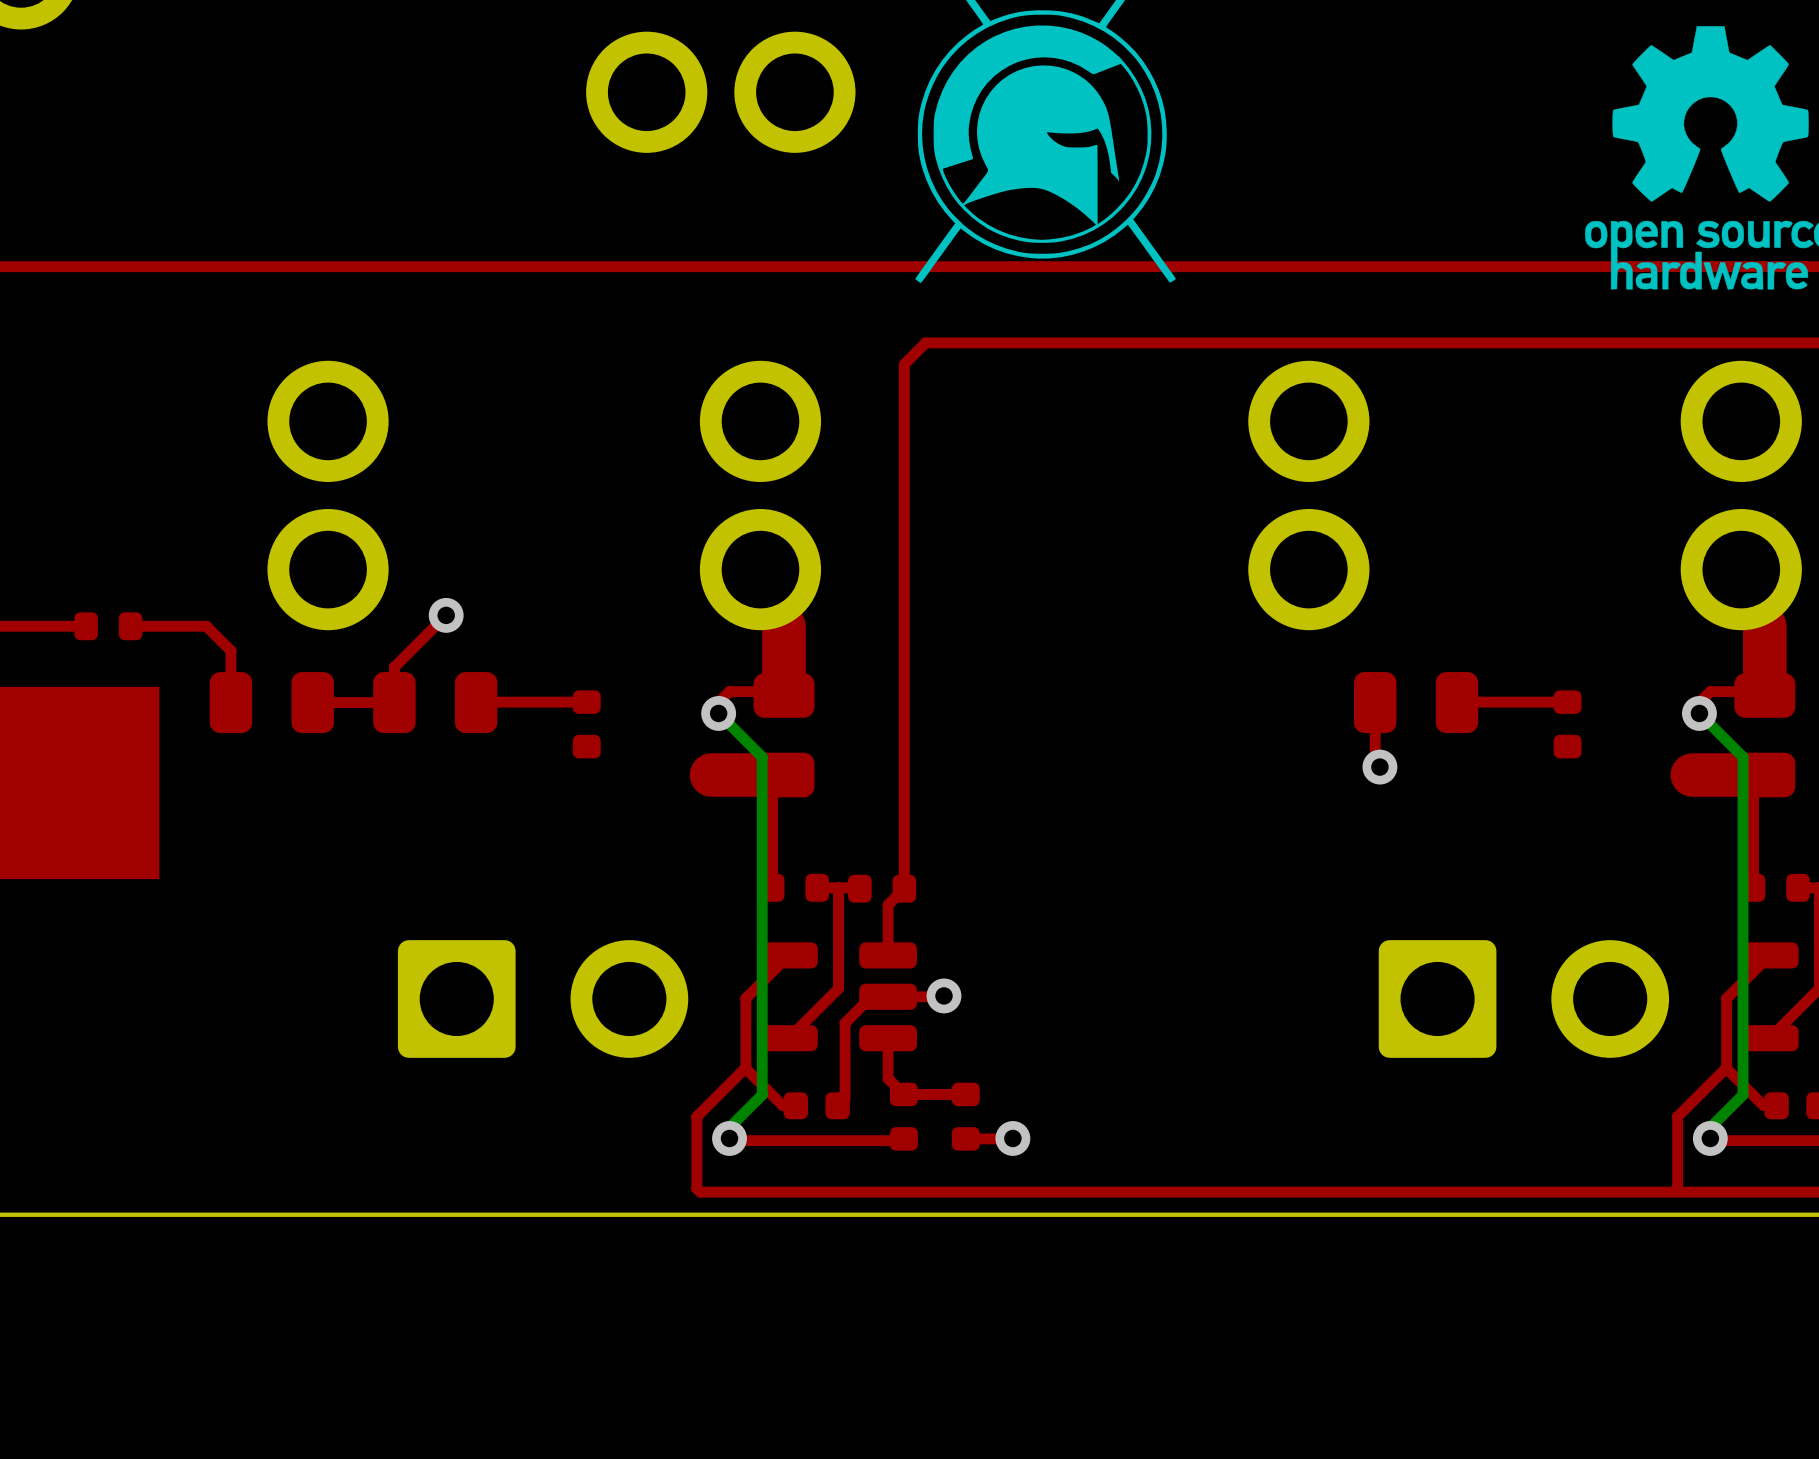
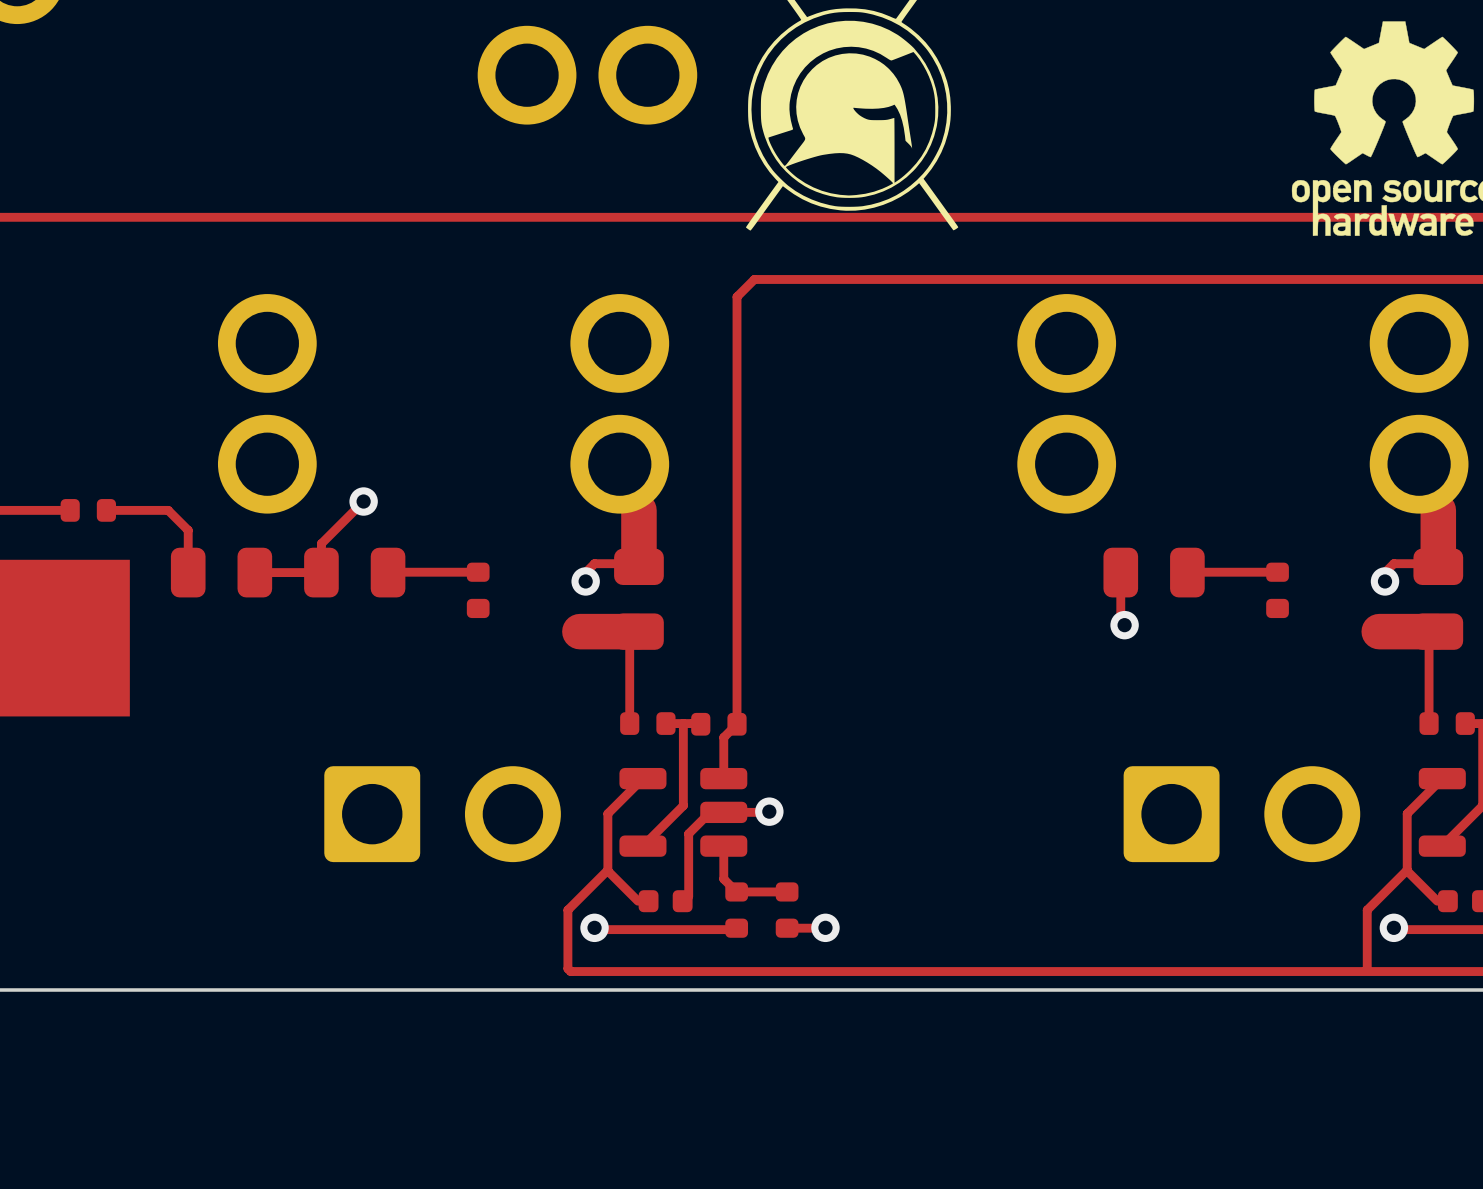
bottom track: (718, 713) (762, 757) (762, 1094) (729, 1127) (729, 1138) -> none
bottom track: (1699, 713) (1743, 757) (1743, 1094) (1710, 1127) (1710, 1138) -> none

